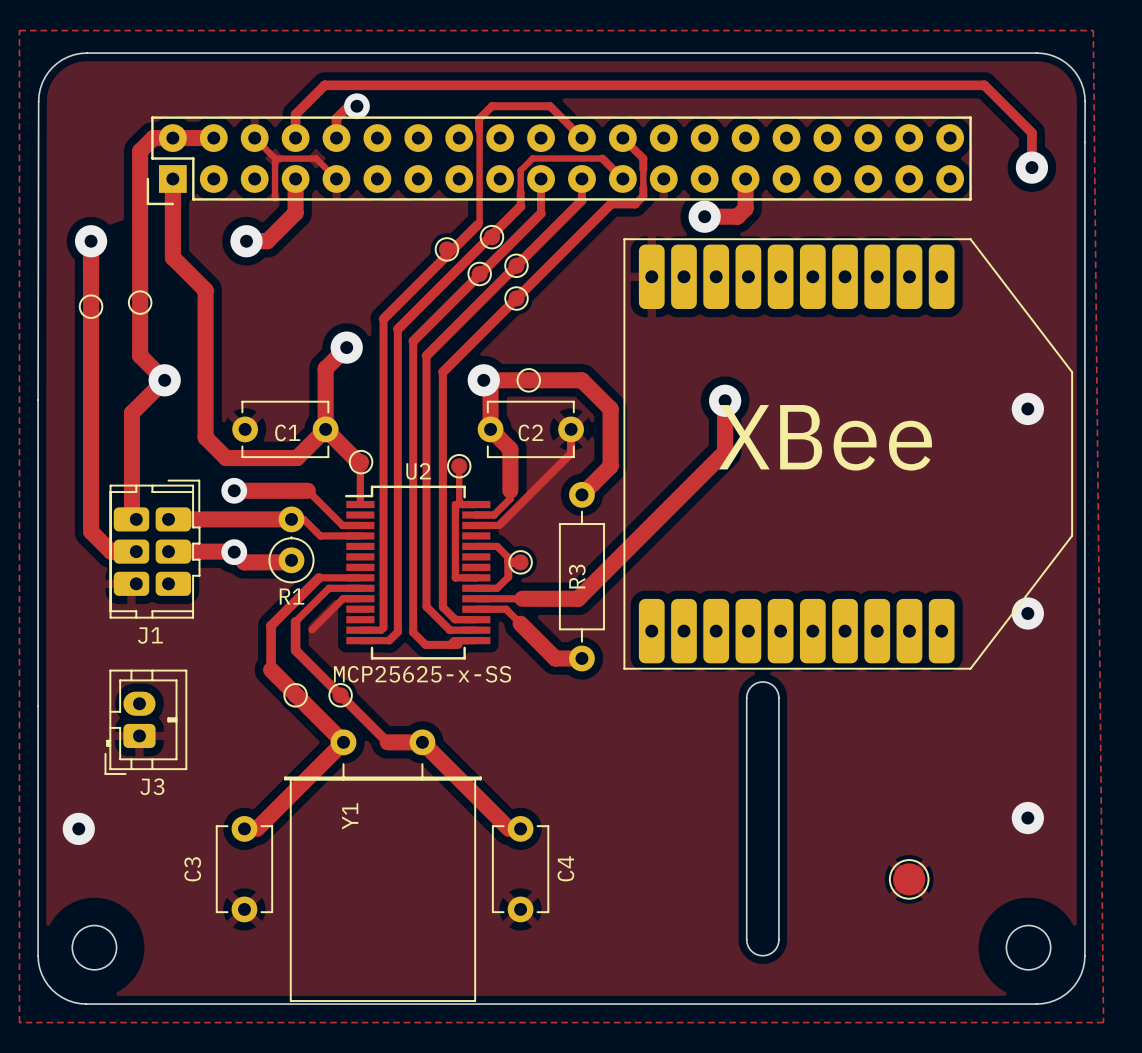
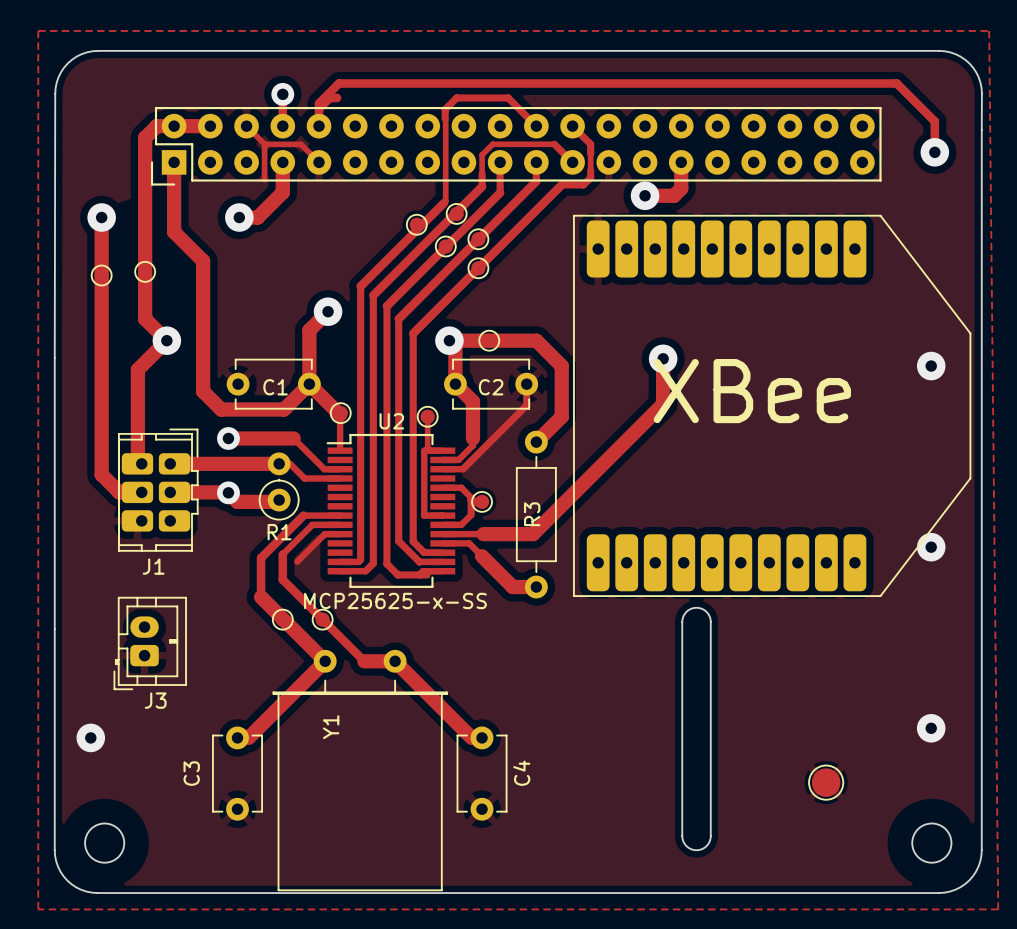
track: (988, 89) (984, 85) (324, 85) (295, 114) -> (896, 83) (338, 83) (319, 103) (319, 108)
via position: (356, 106) -> (282, 94)

